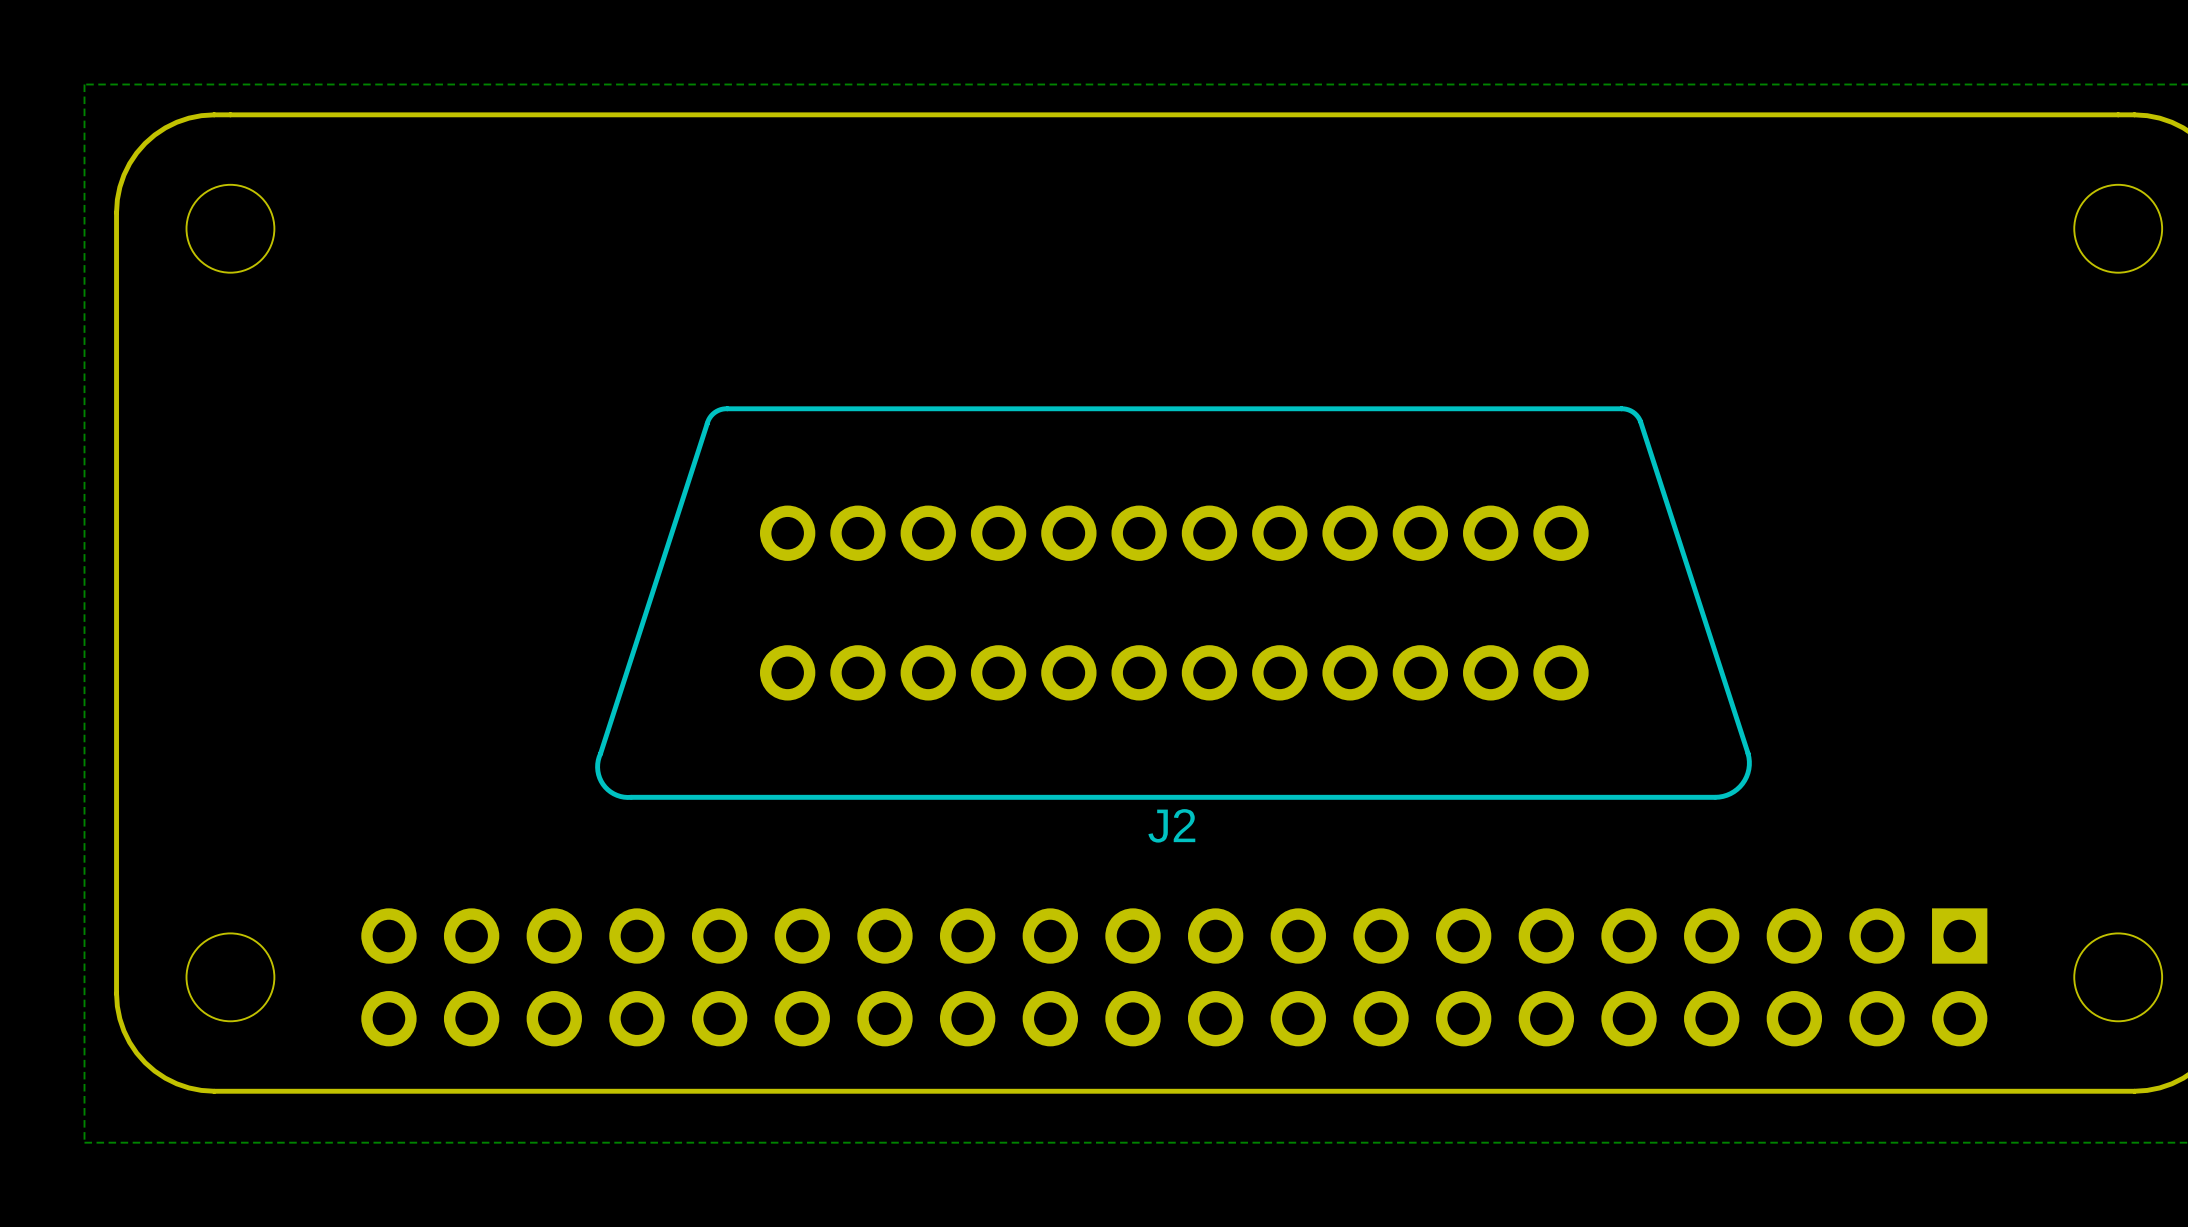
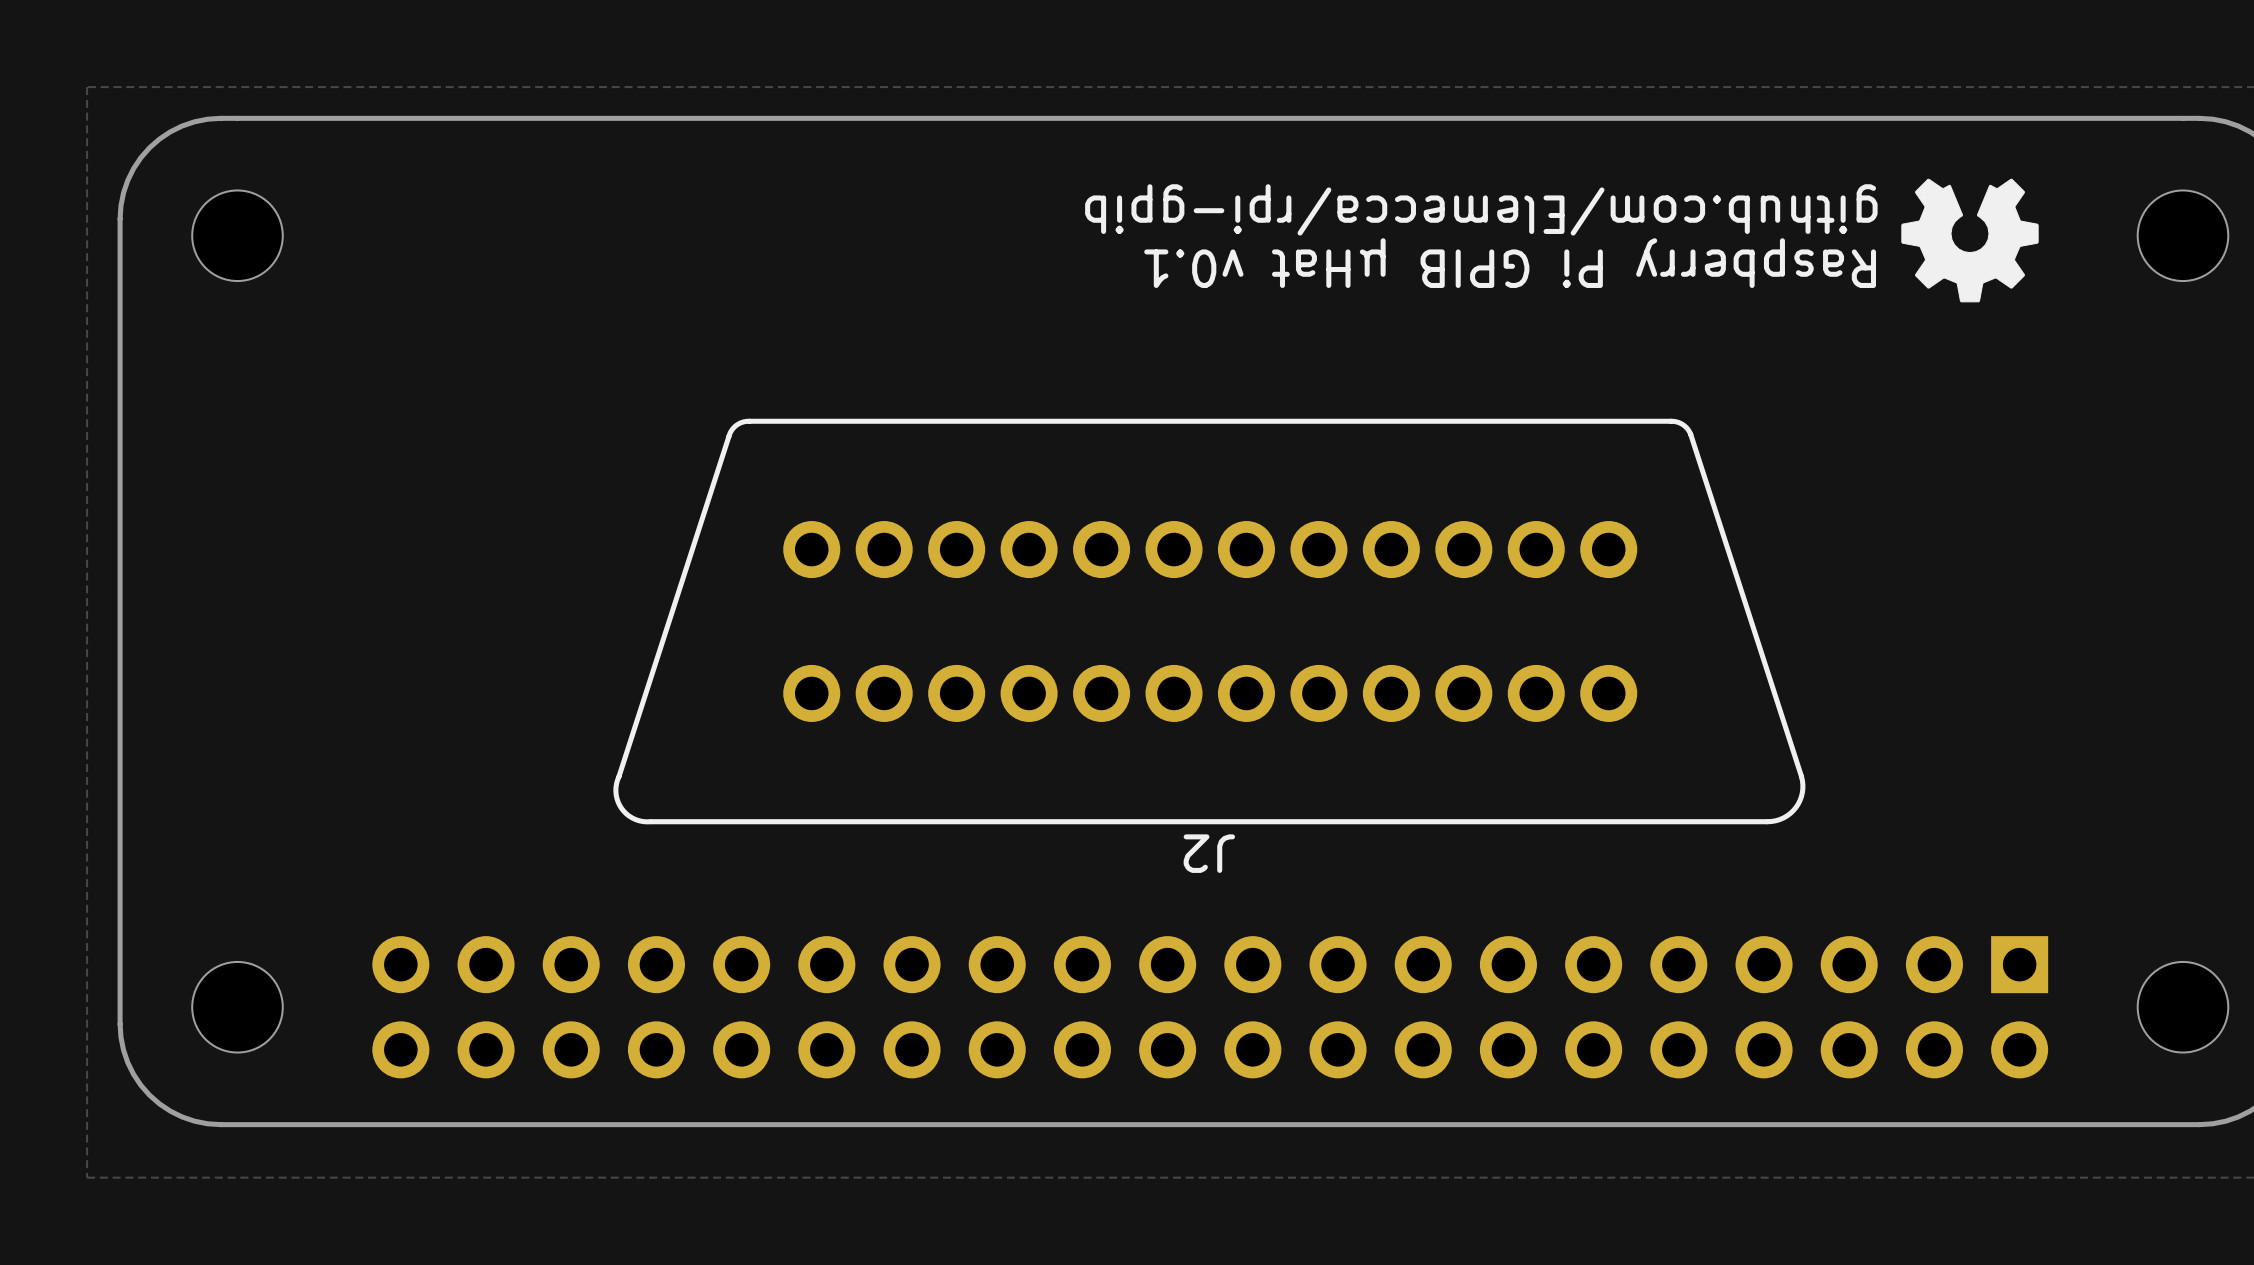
drawing: none -> [1901, 178, 2039, 303]
text: none -> github.com/Elemecca/rpi-gpib (1481, 209)
text: none -> Raspberry Pi GPIB µHat v0.1 (1510, 263)
J2 name rotation: 0° (1171, 825) -> 180° (1209, 853)

